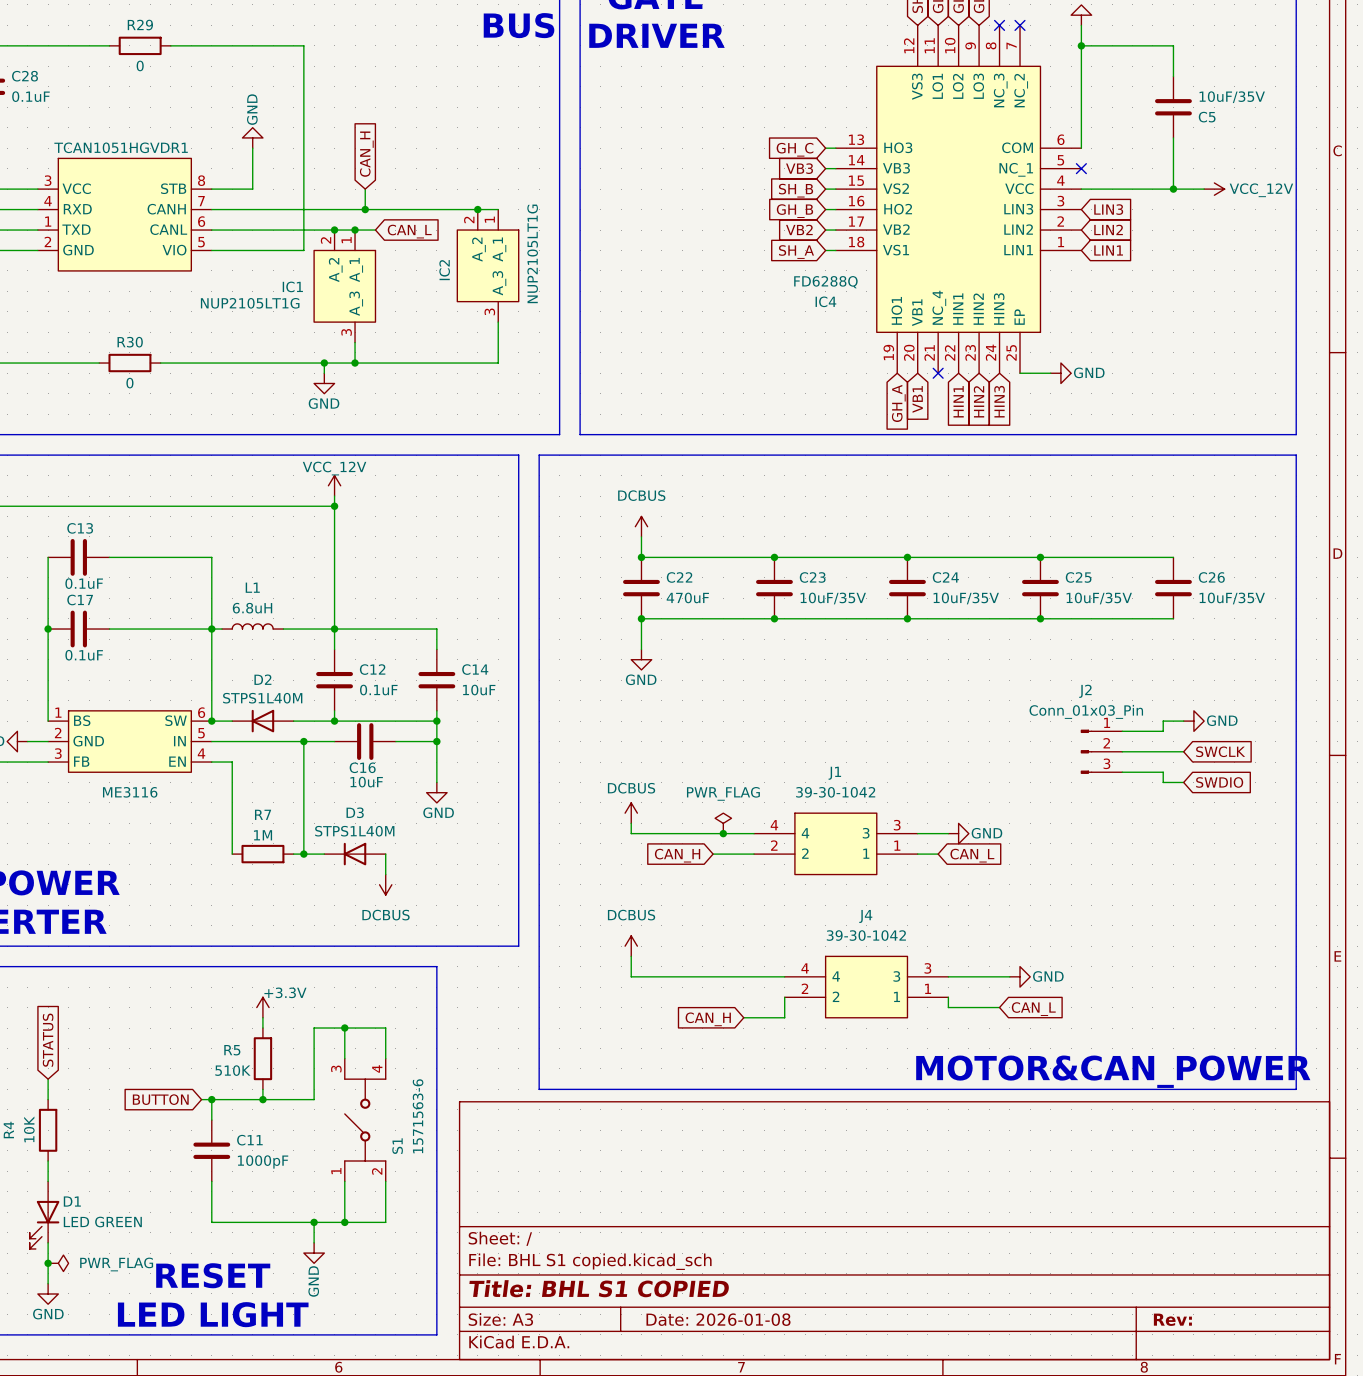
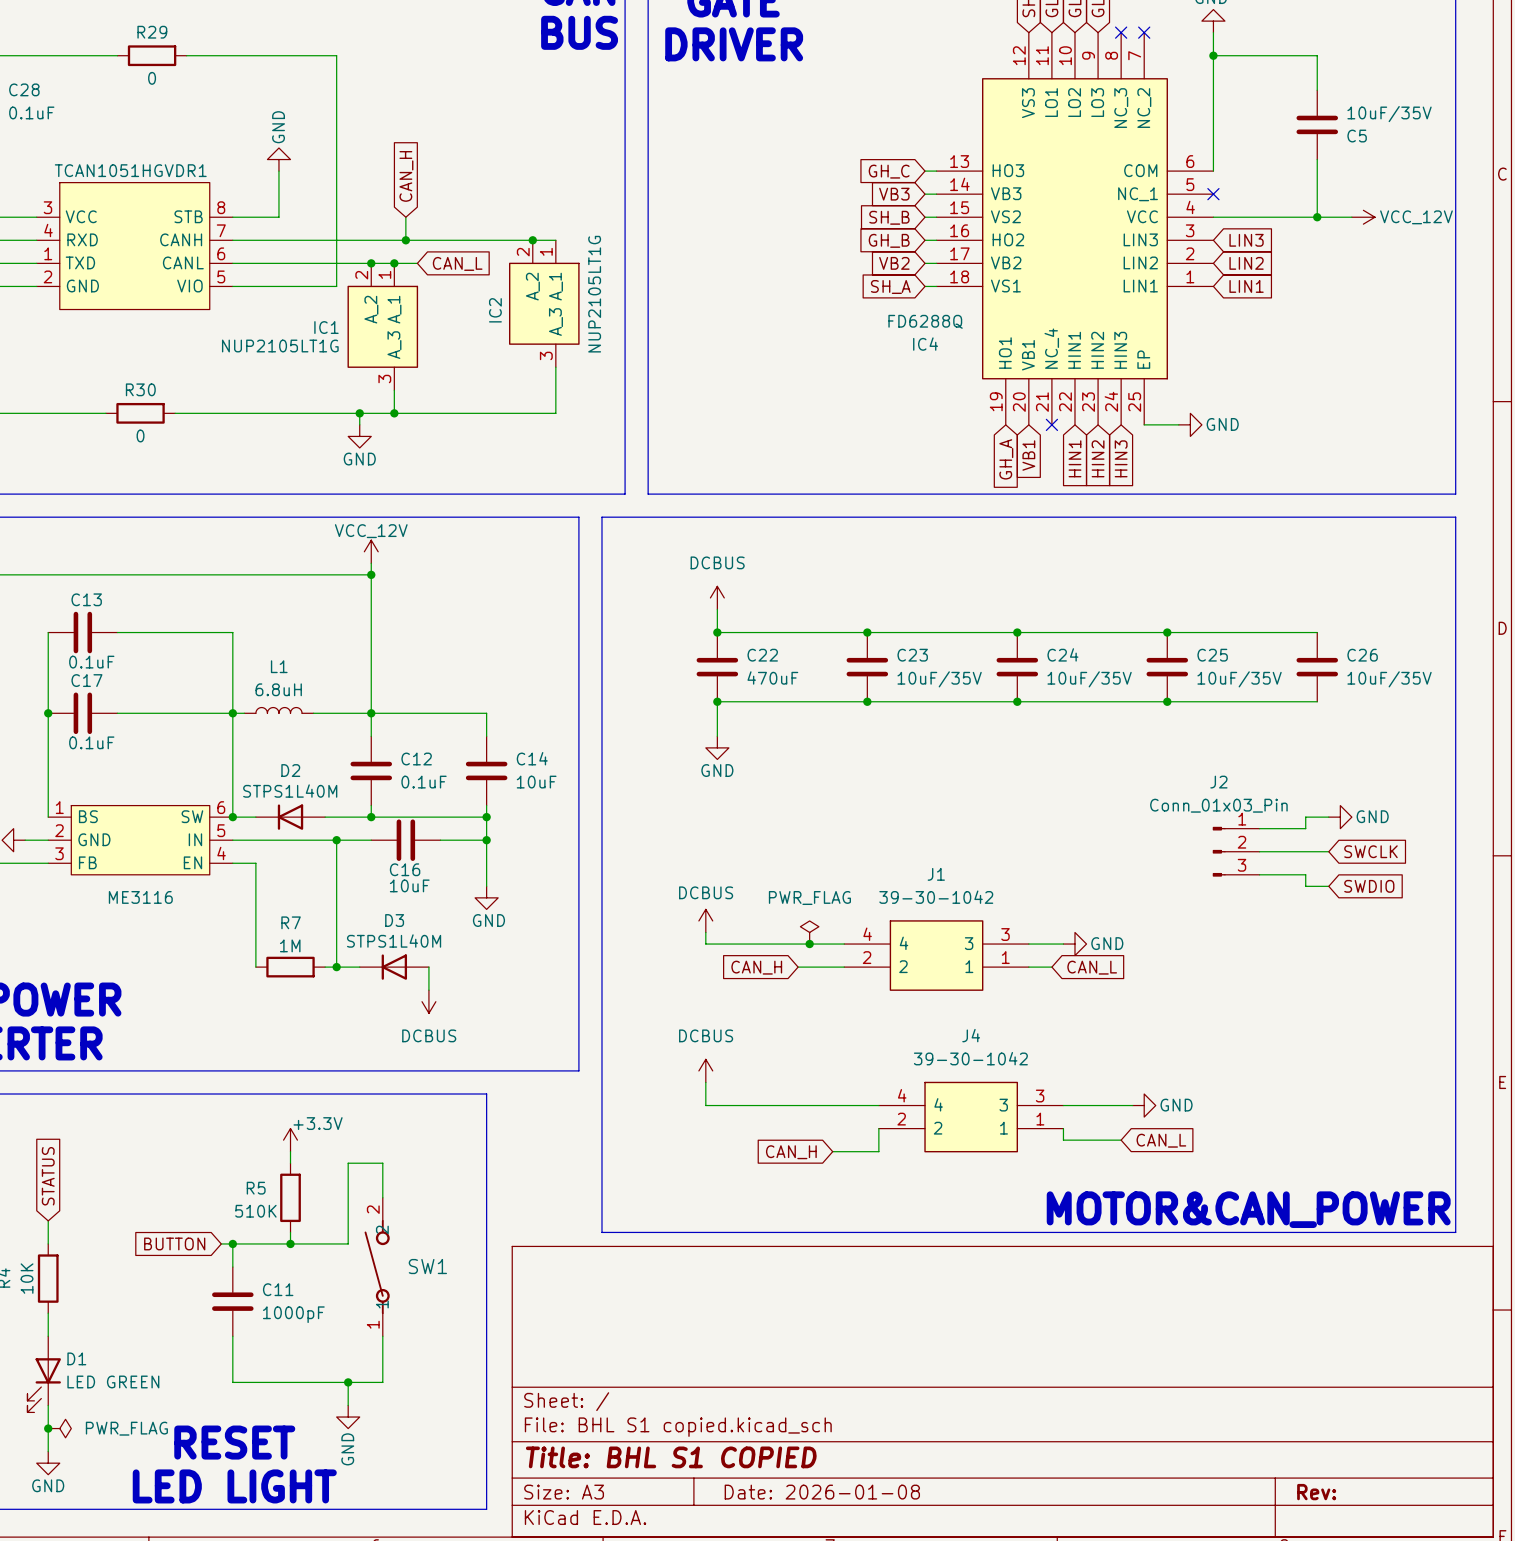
wire: (344, 1028) (385, 1028) (385, 1058) -> none
junction: (344, 1028) -> none
SW1: none -> (377, 1267)
S1: 1571563-6 (365, 1120) -> none
wire: (385, 1181) (385, 1222) (344, 1222) -> none
junction: (344, 1222) -> none

